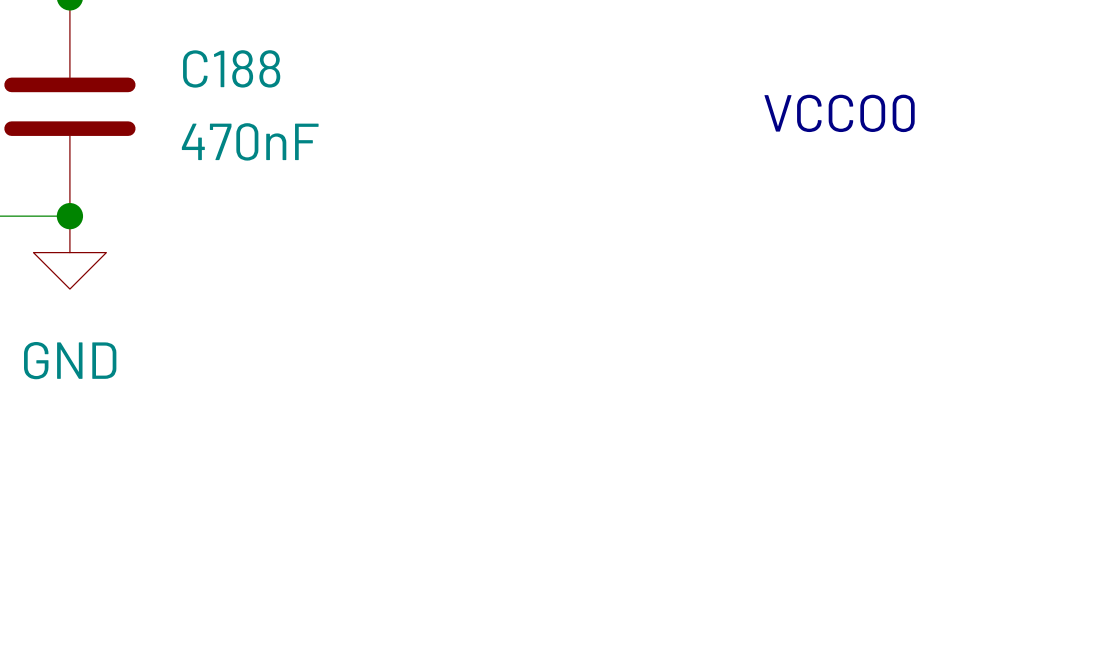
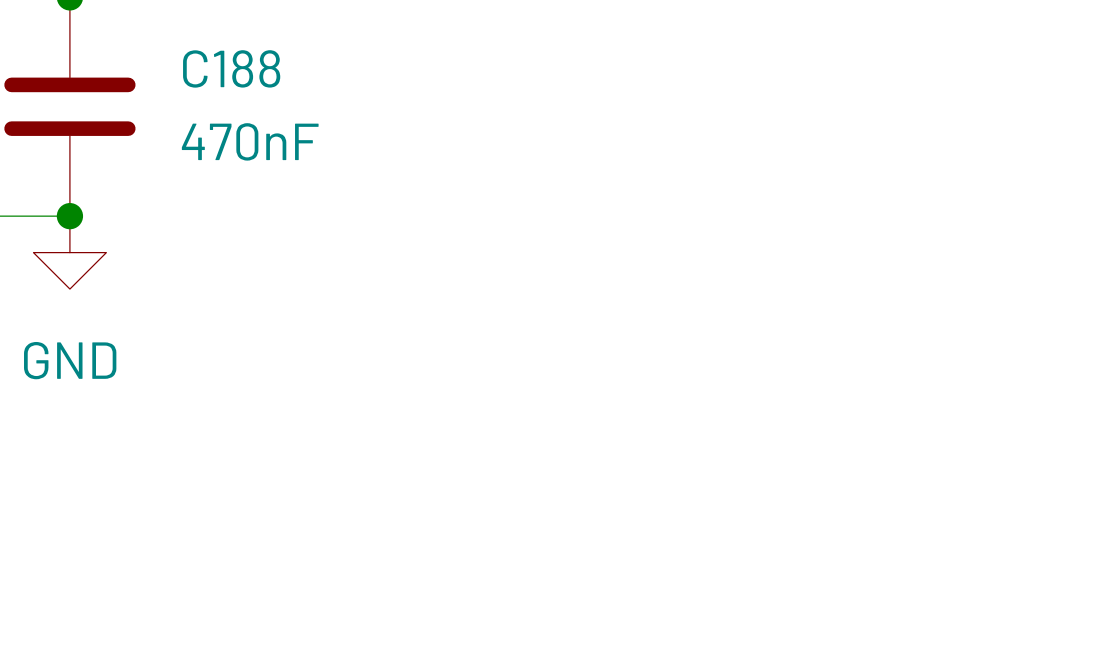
text: VCCO0 (839, 113) -> none

